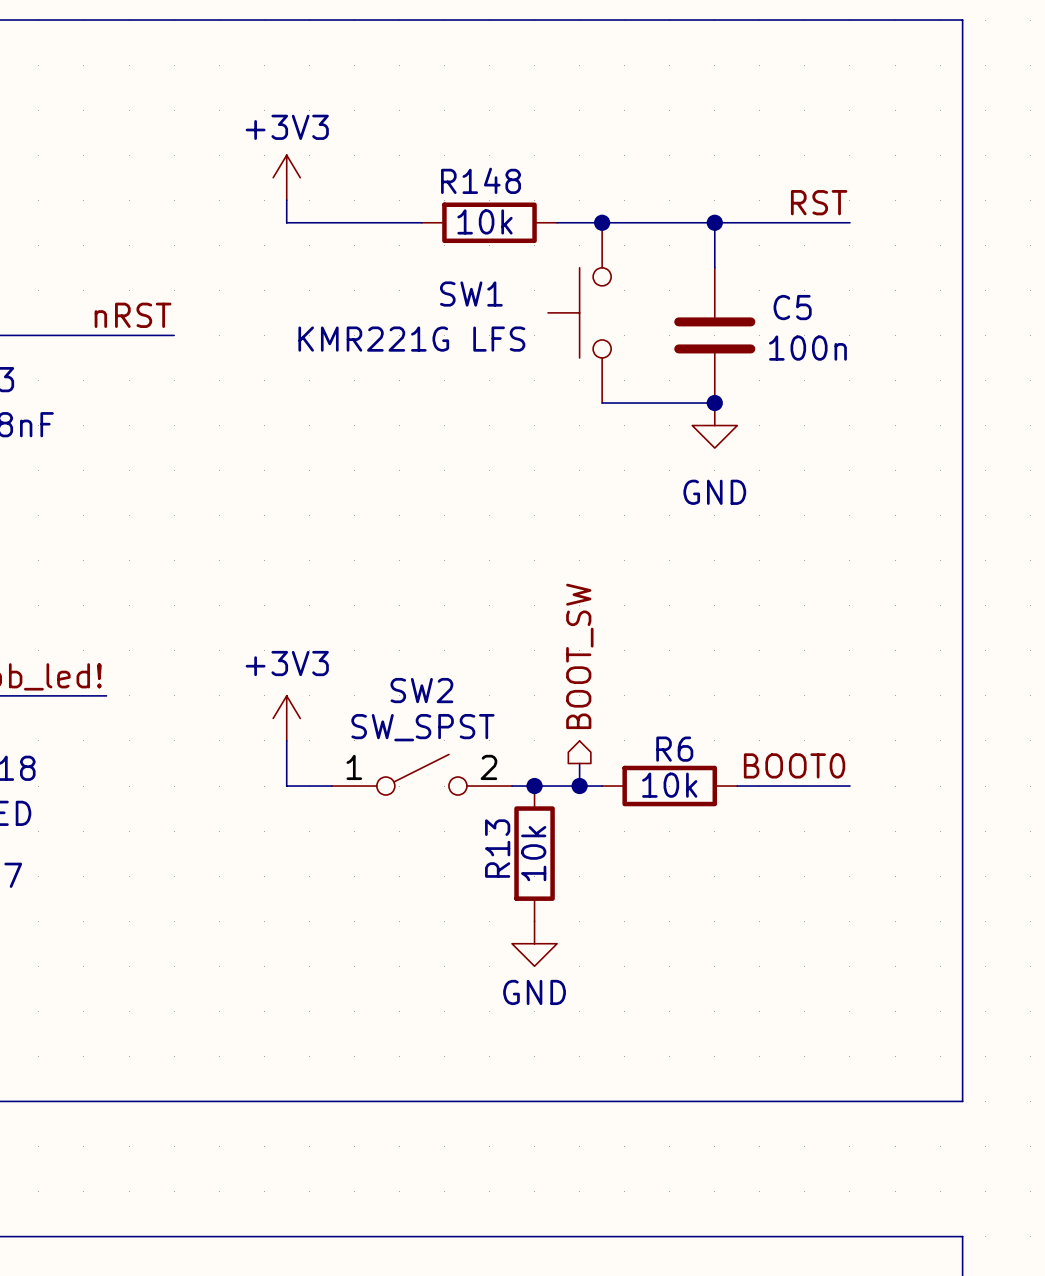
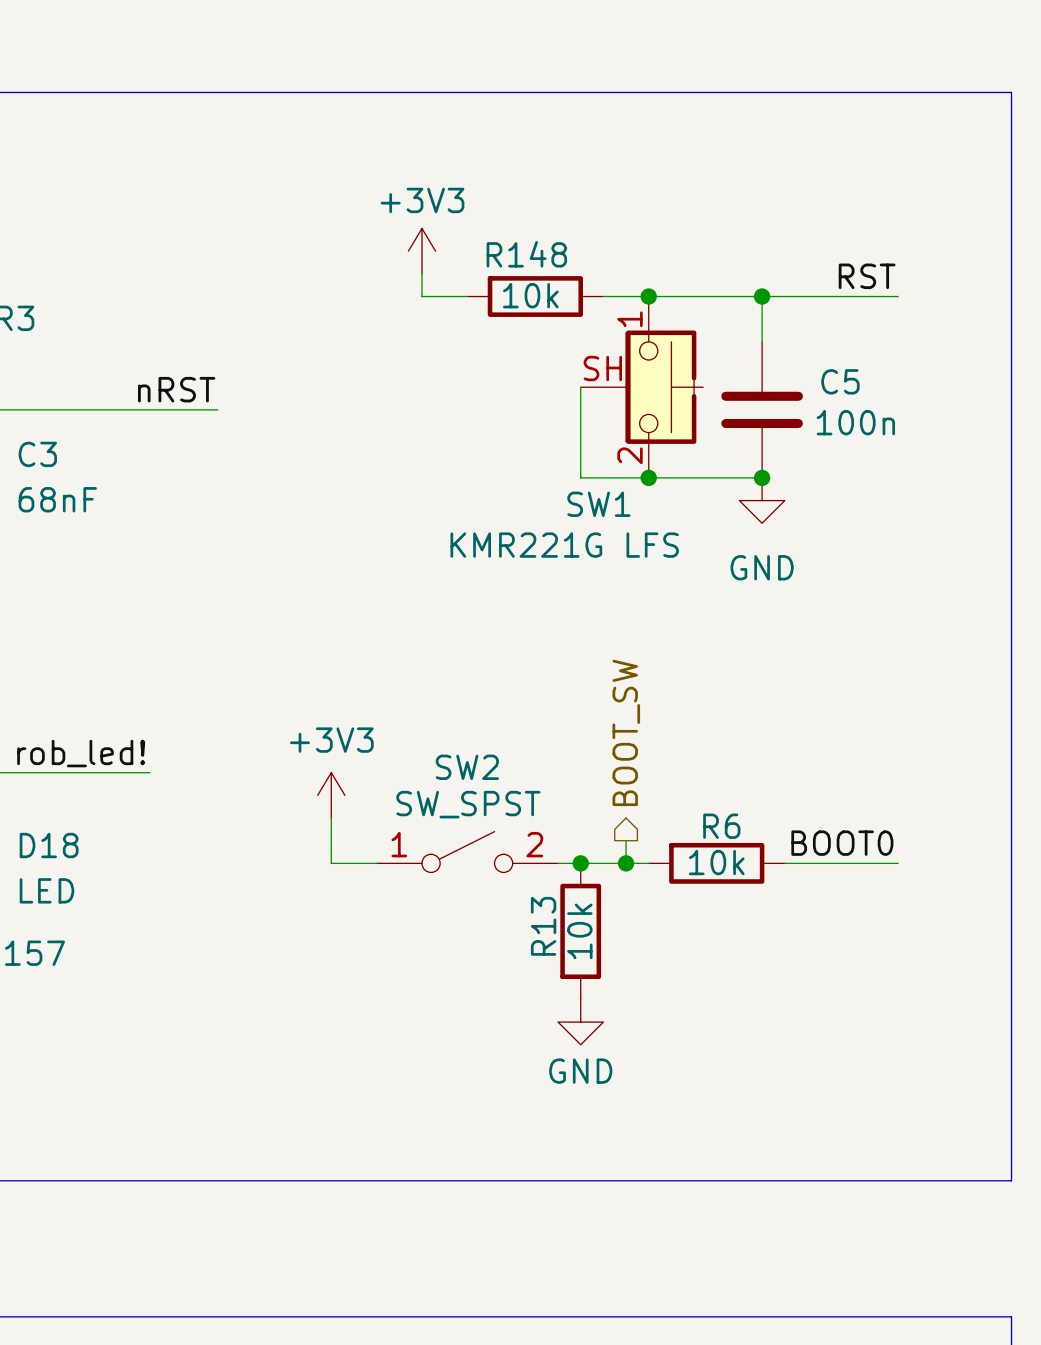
power symbol position: +3V3 (286, 177) -> +3V3 (421, 251)
wire: (286, 200) (286, 222) (376, 222) -> (421, 273) (421, 296)
SW1 symbol: [548, 222, 612, 404] -> [580, 296, 704, 478]
SW1 name position: SW1 (471, 294) -> SW1 (598, 504)
wire: none -> (580, 387) (580, 477) (648, 477)
SW1 value position: KMR221G LFS (411, 339) -> KMR221G LFS (564, 545)
junction: none -> (648, 477)

